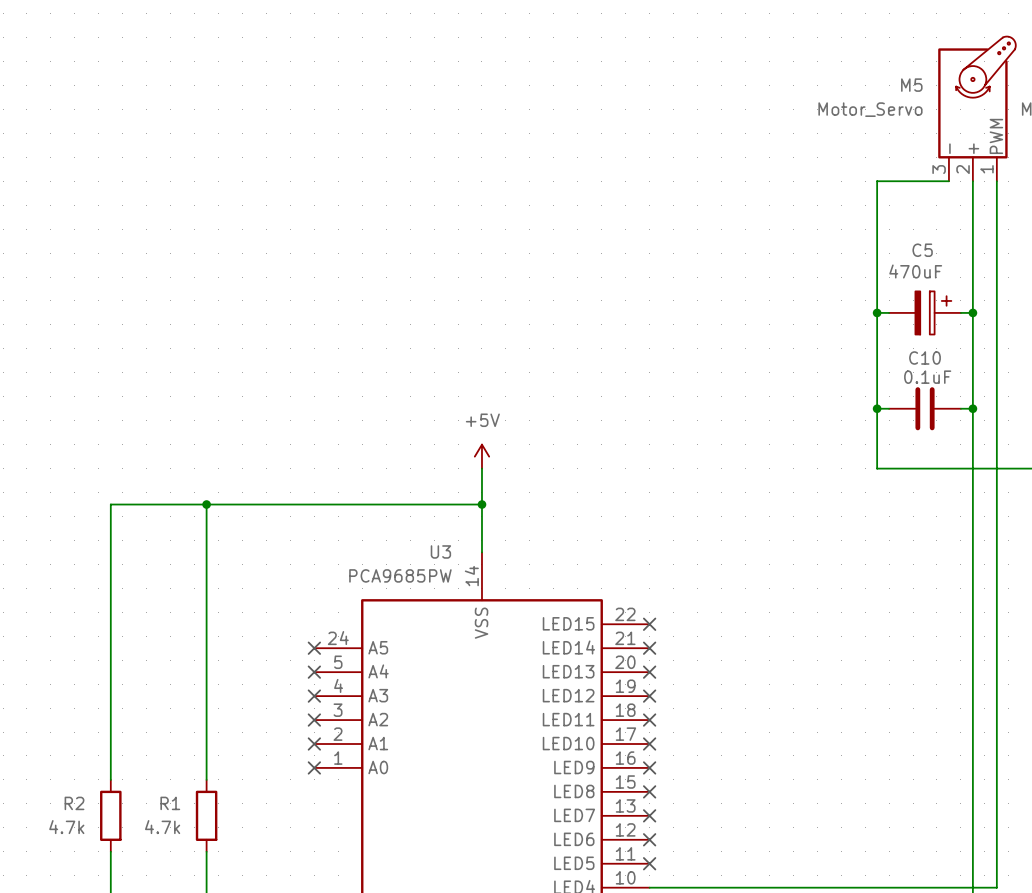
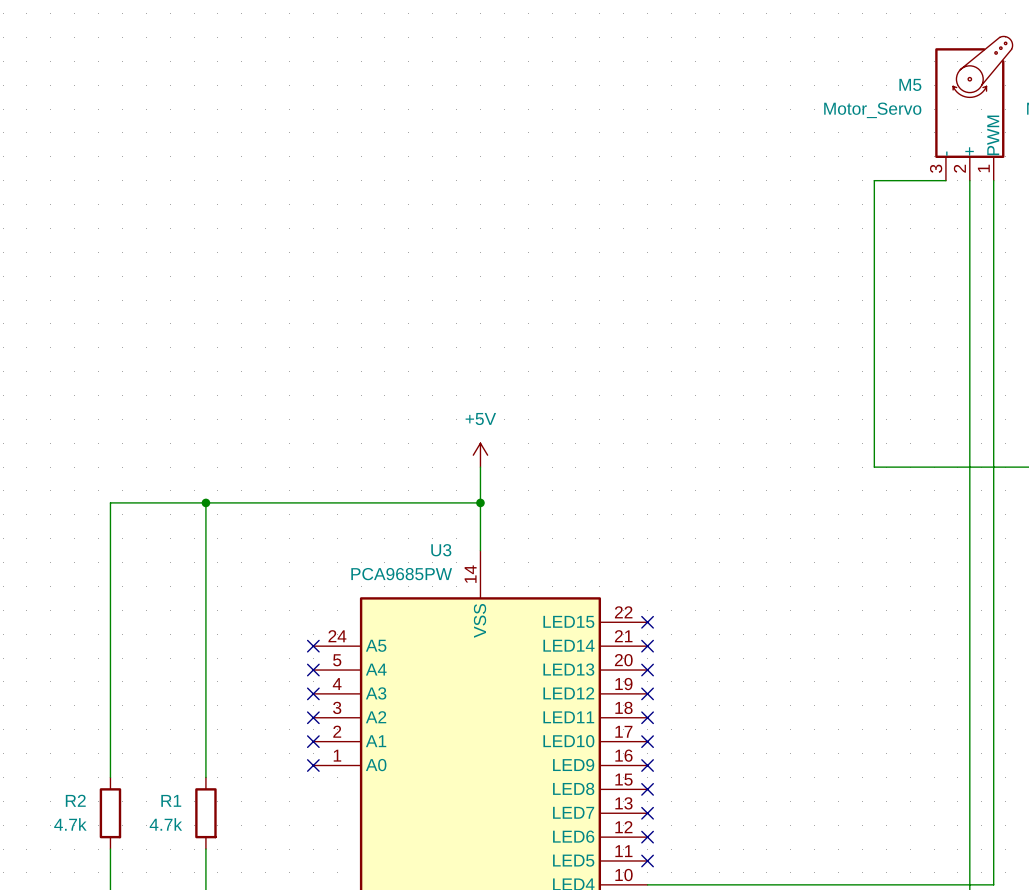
wire: (877, 312) (889, 312) -> none
junction: (877, 312) -> none
C5: 470uF (925, 312) -> none
wire: (960, 312) (972, 312) -> none
junction: (972, 312) -> none
wire: (877, 408) (889, 408) -> none
junction: (877, 408) -> none
C10: 0.1uF (925, 408) -> none
wire: (960, 408) (972, 408) -> none
junction: (972, 408) -> none

